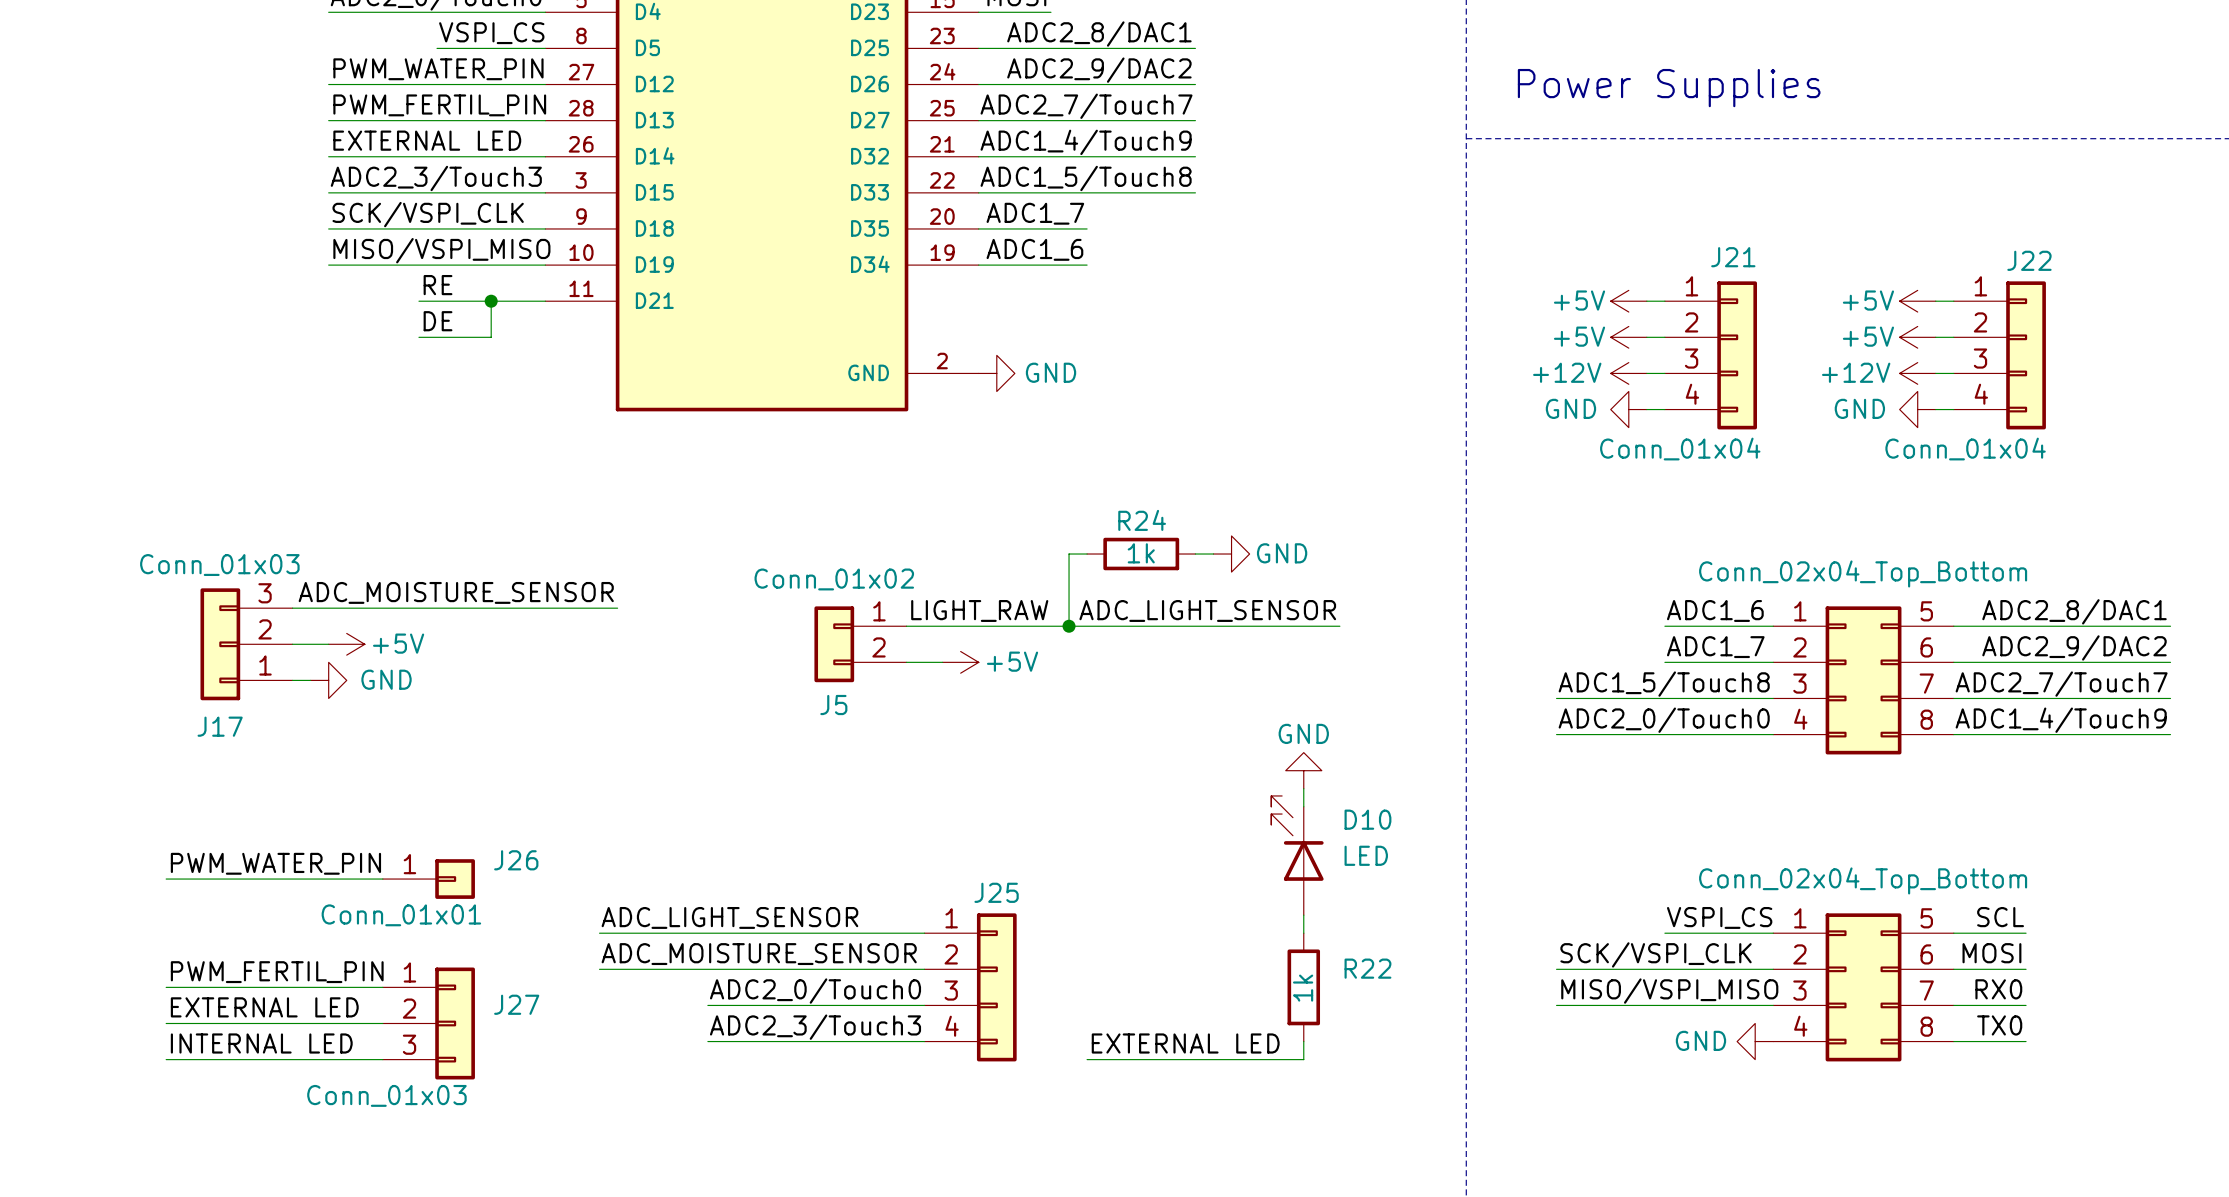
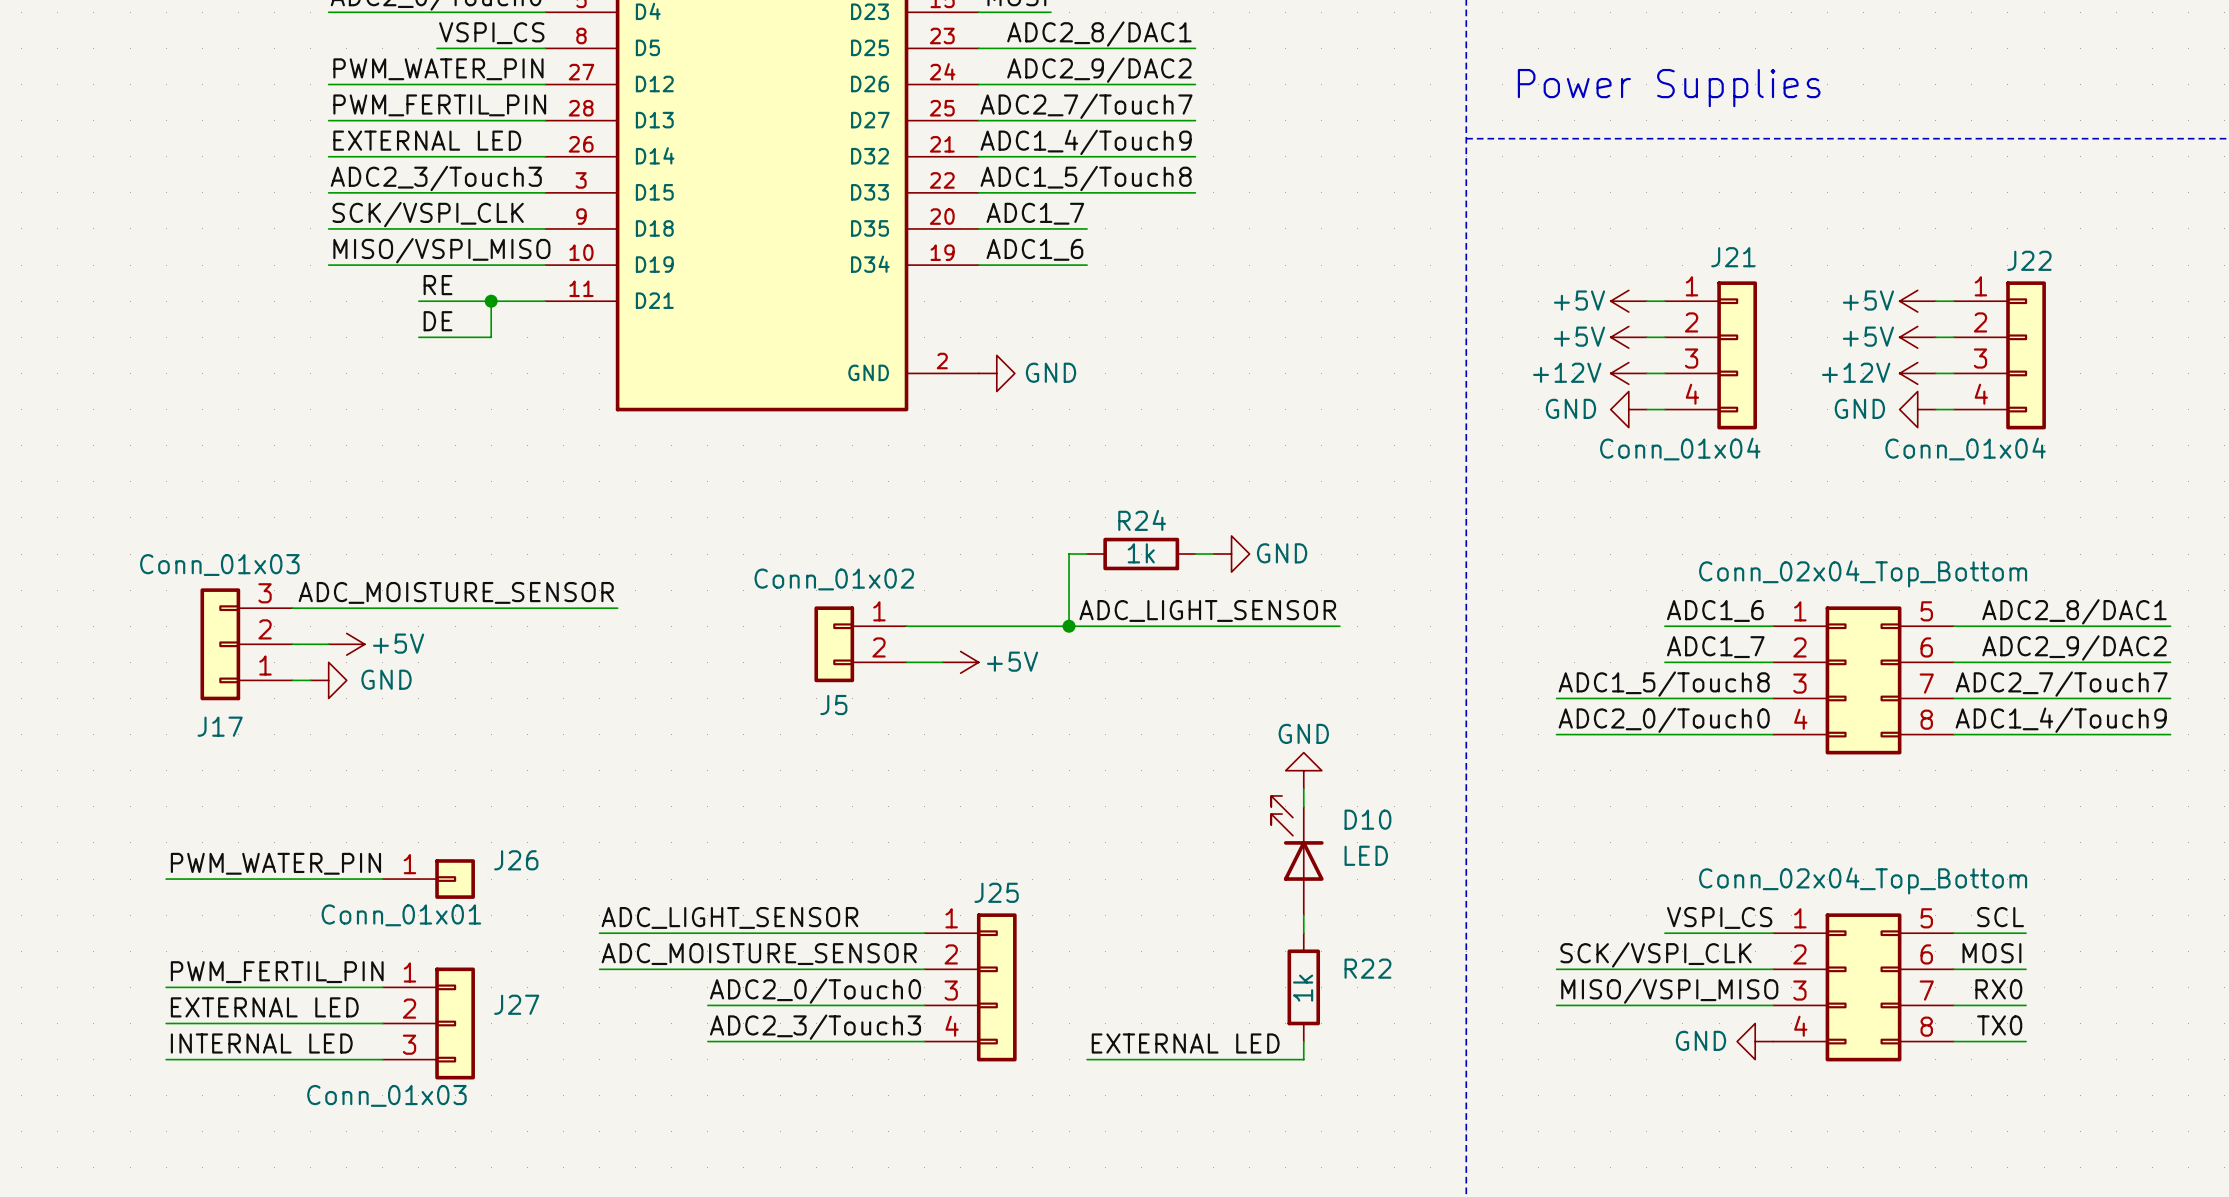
label: LIGHT_RAW (979, 610) -> none

